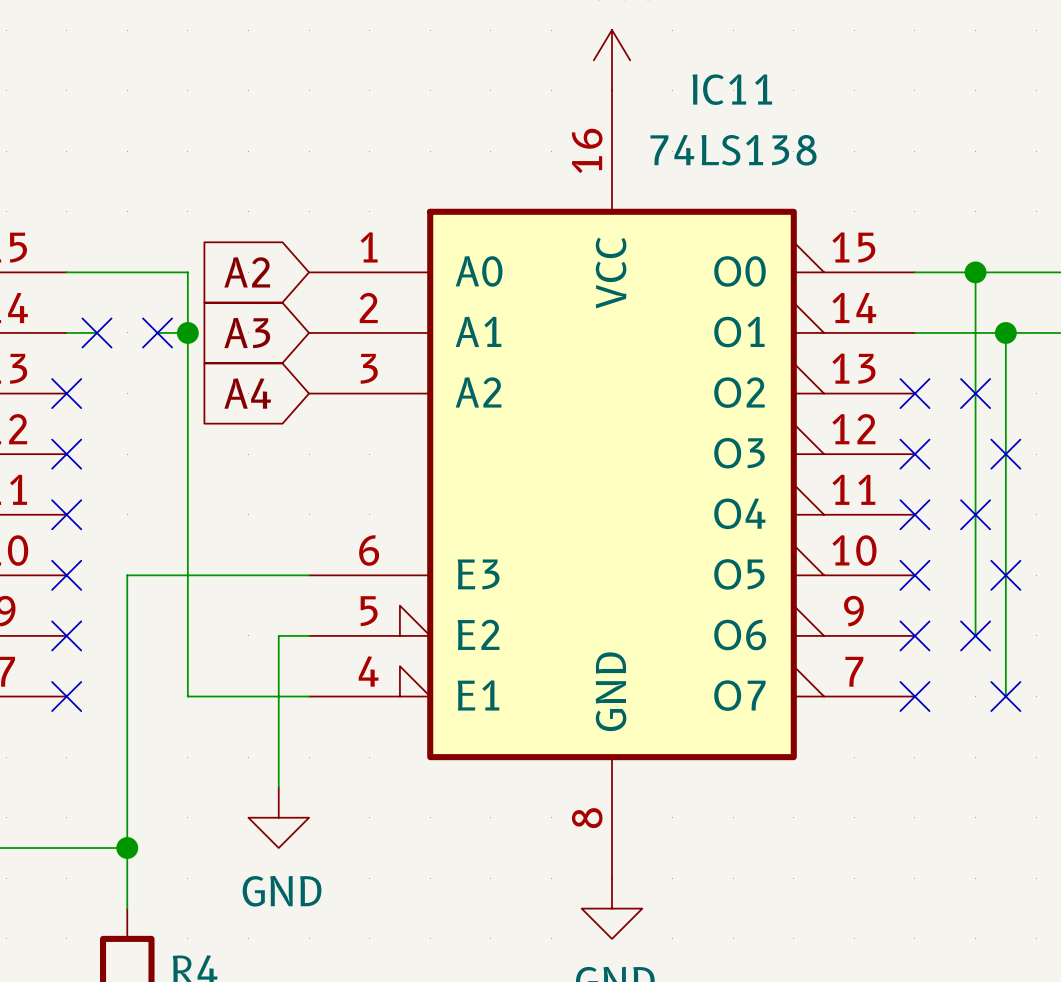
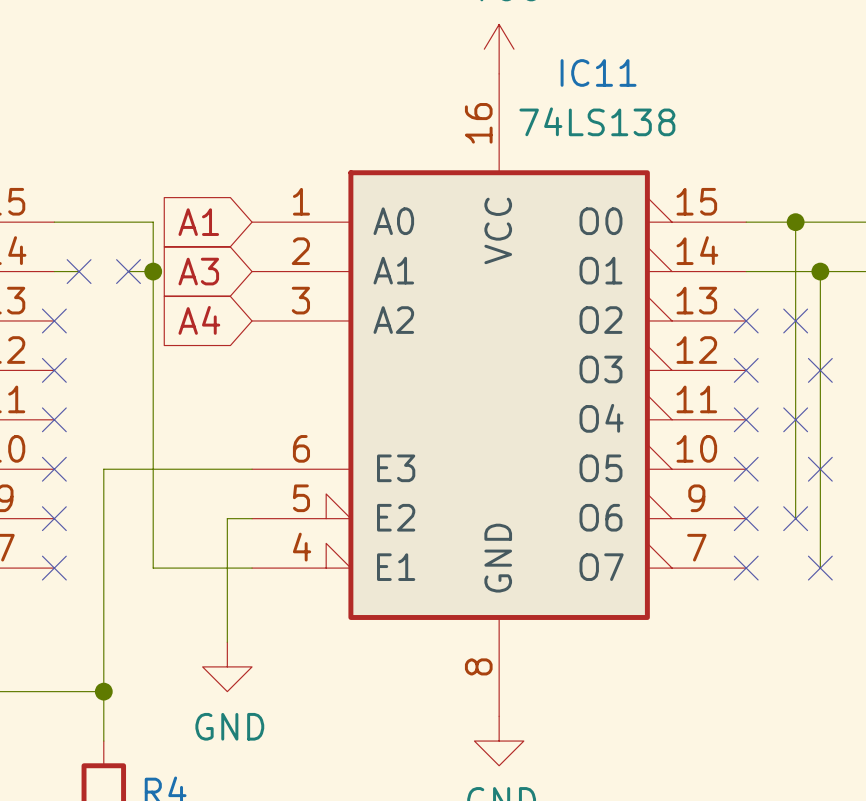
global label: A2 (247, 272) -> A1 (198, 222)

